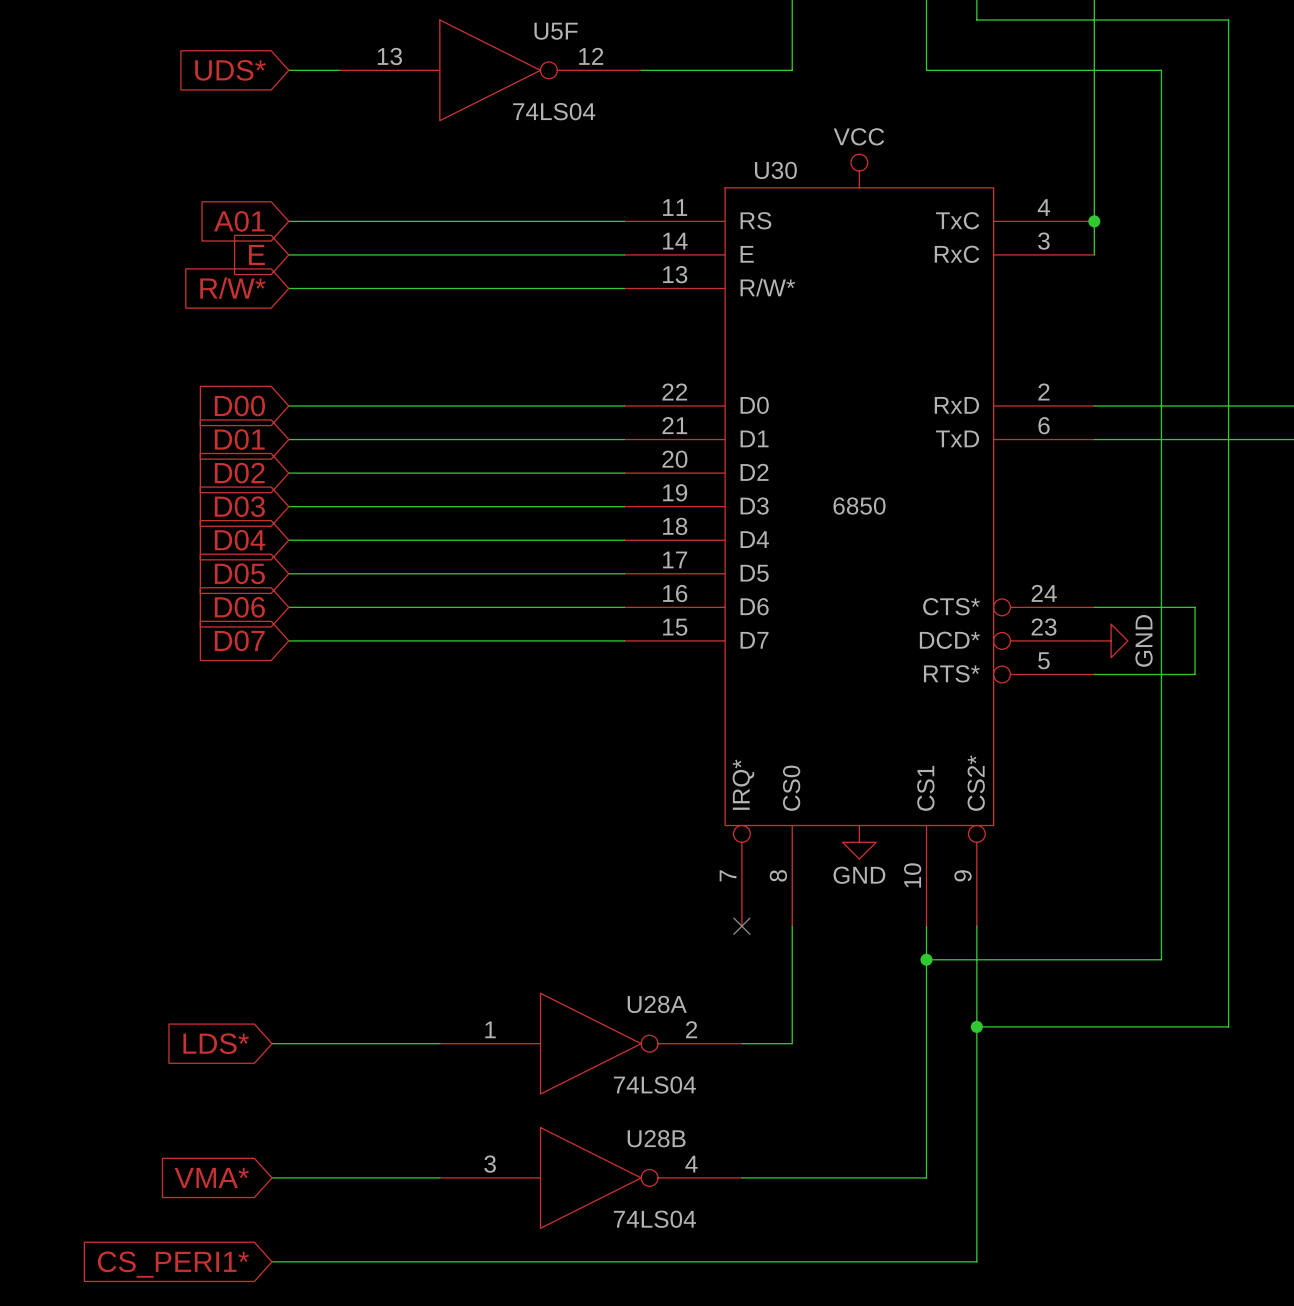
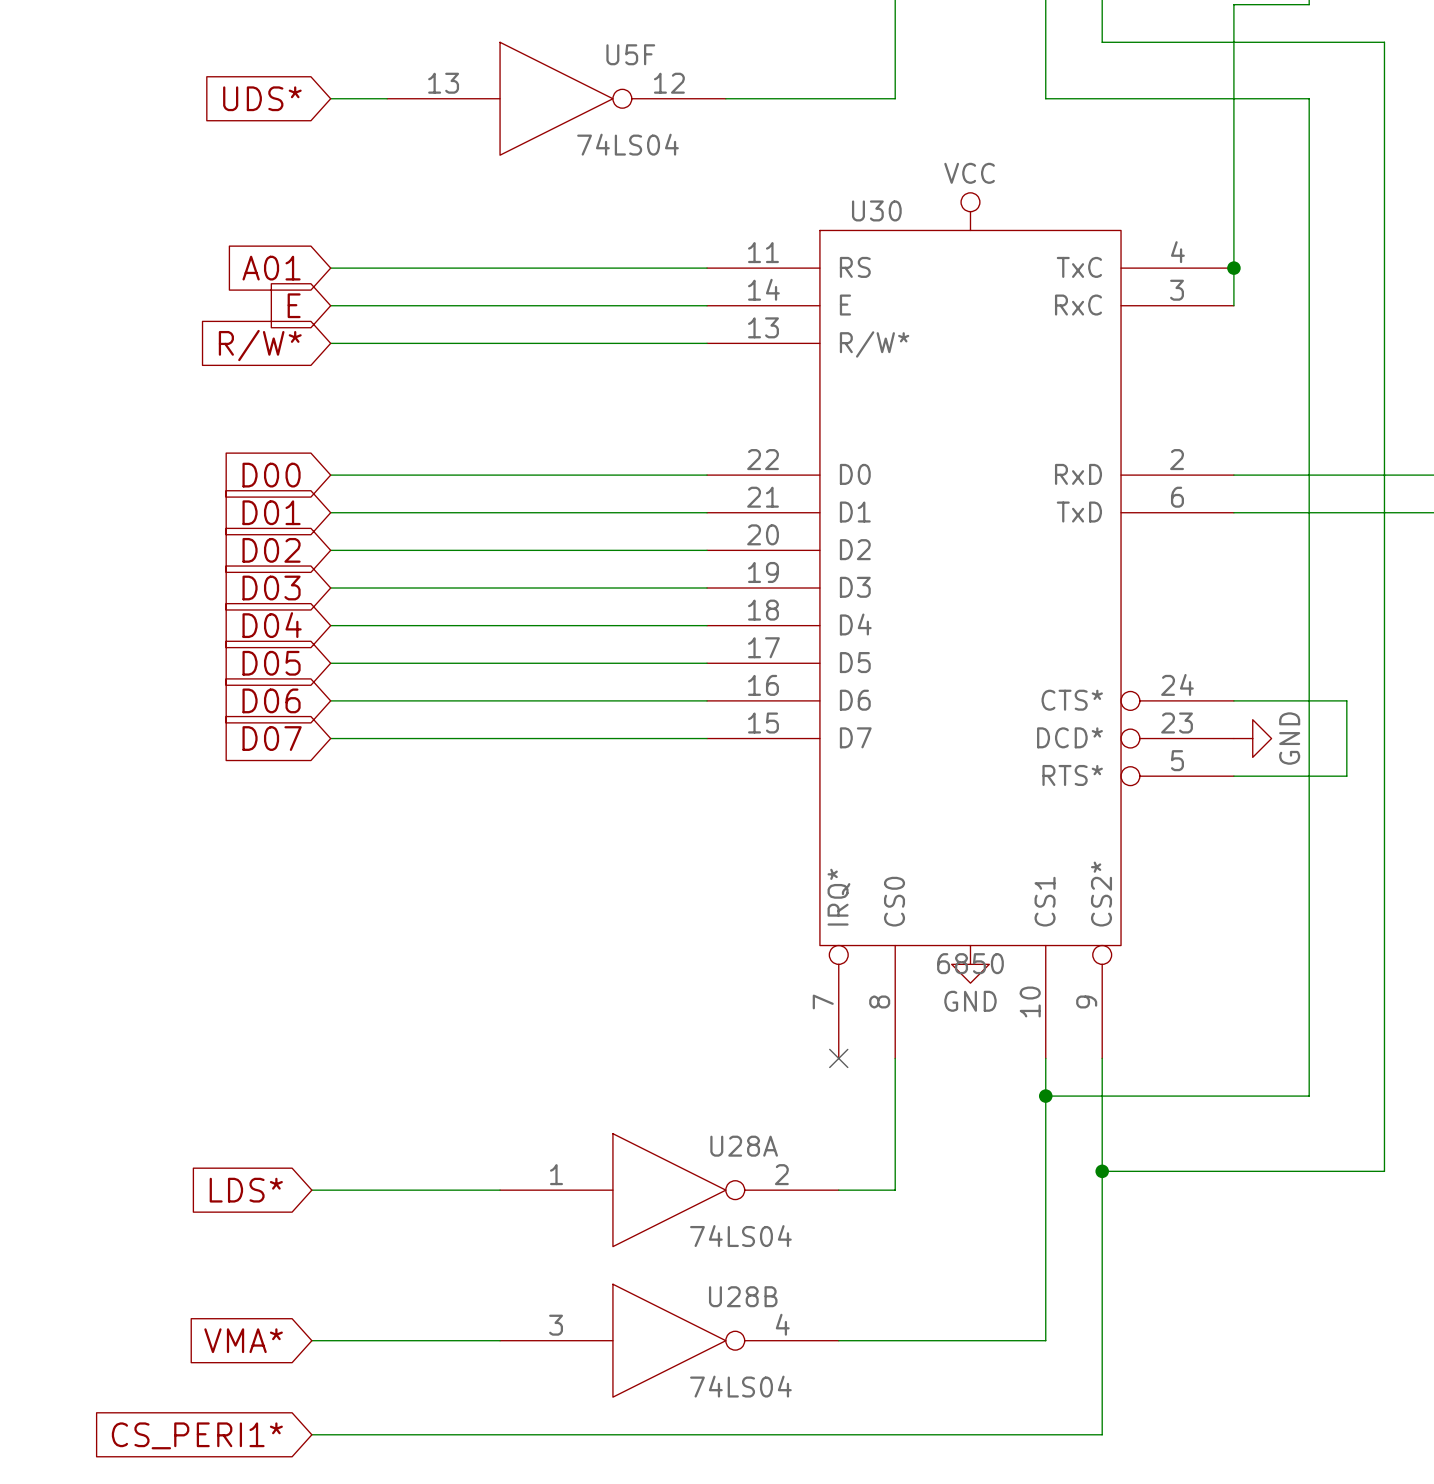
U30 value position: 6850 (859, 506) -> 6850 (970, 963)

